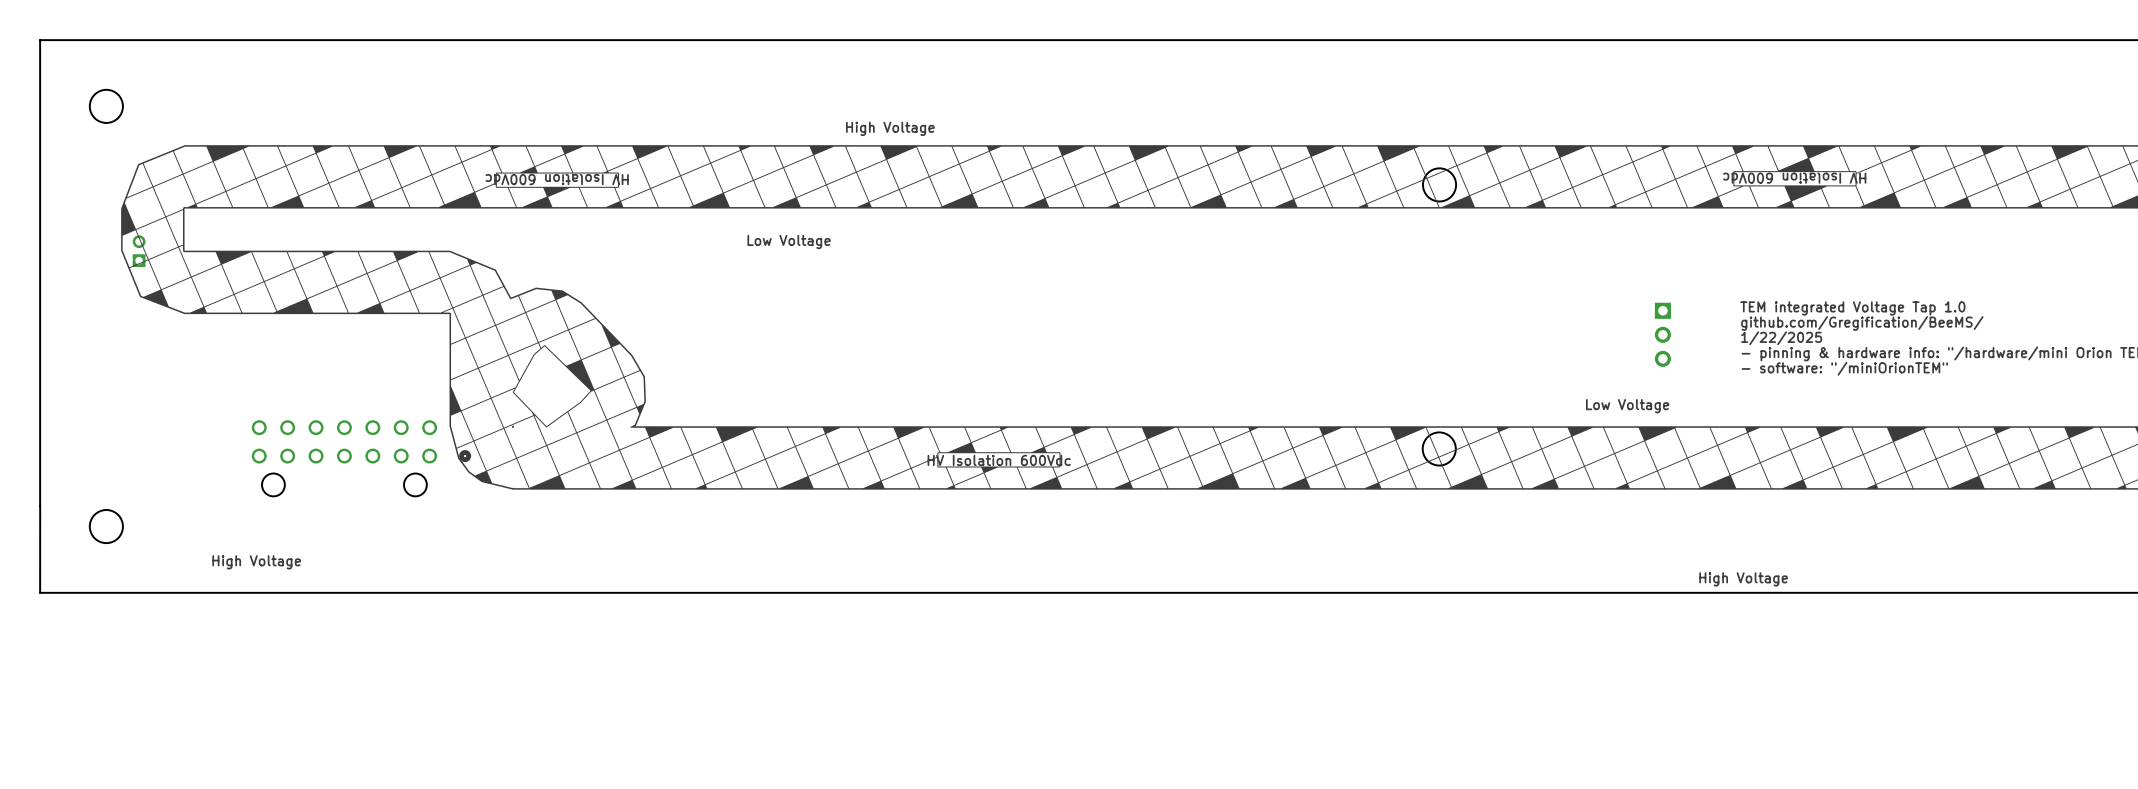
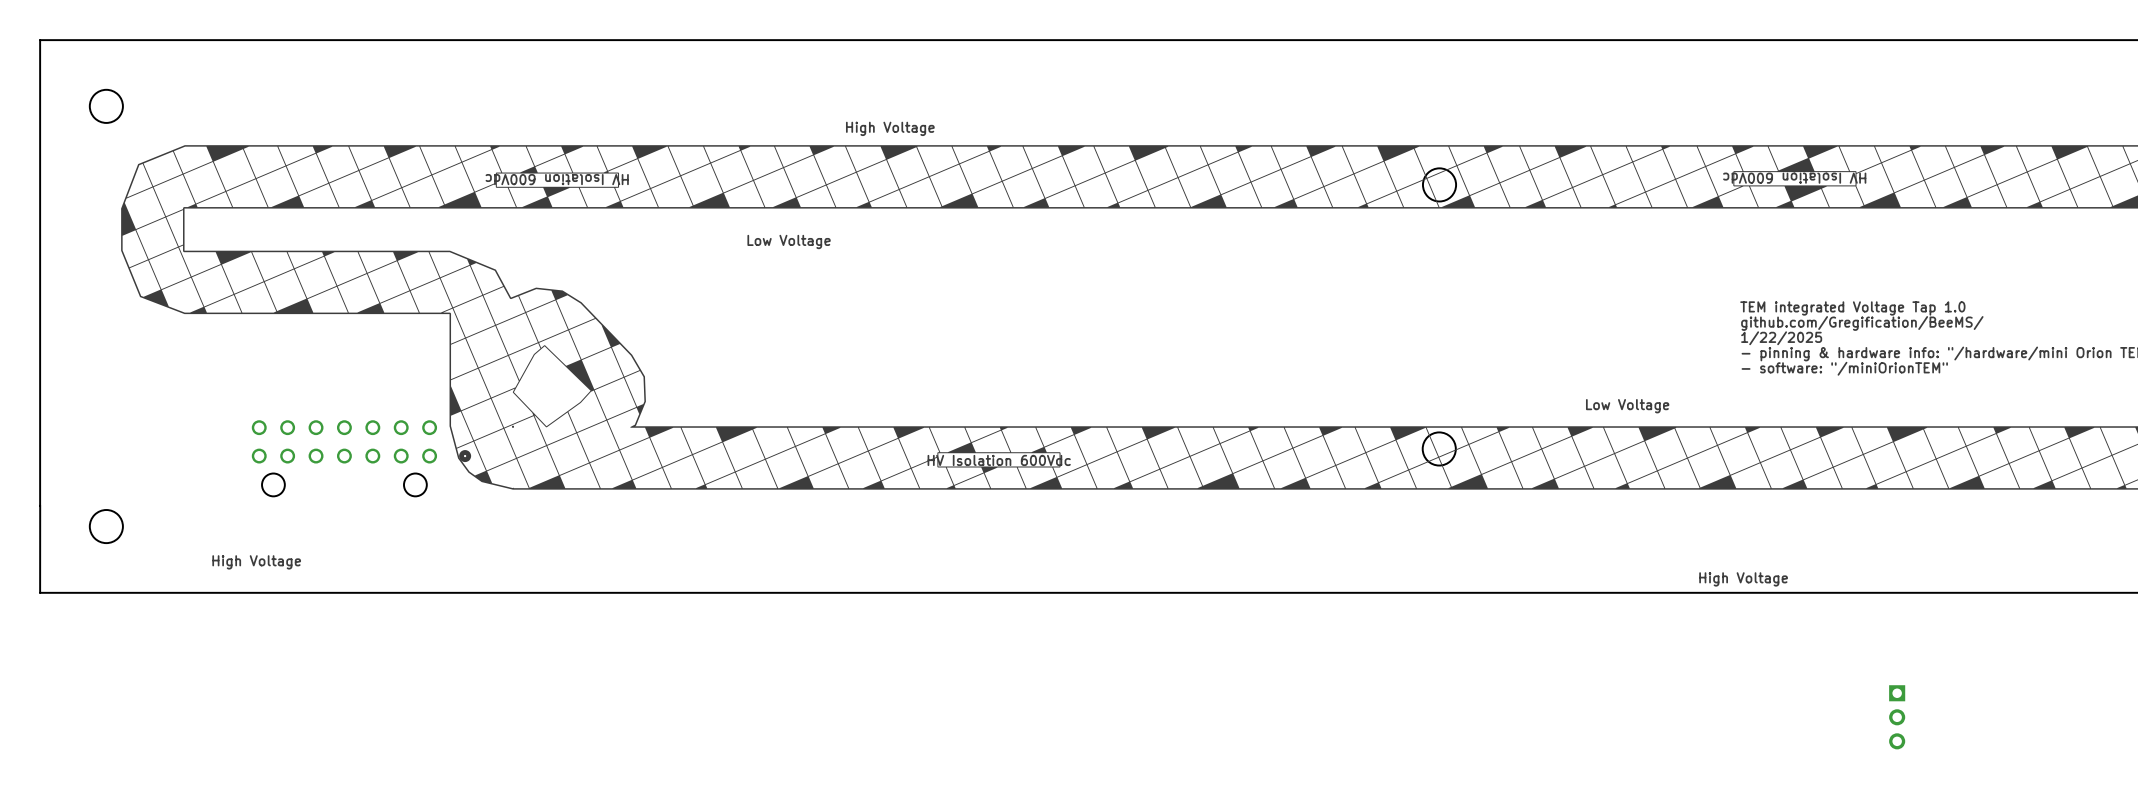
part: (139, 251) -> none
part: (1662, 334) -> none
part: none -> (1897, 717)

